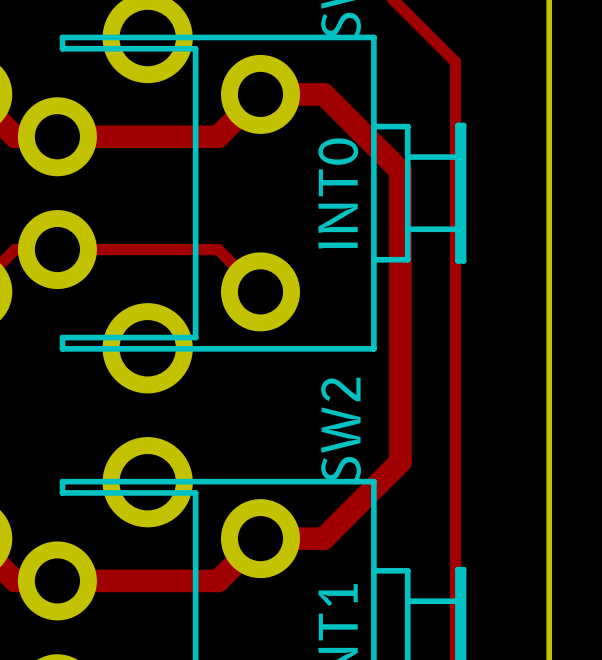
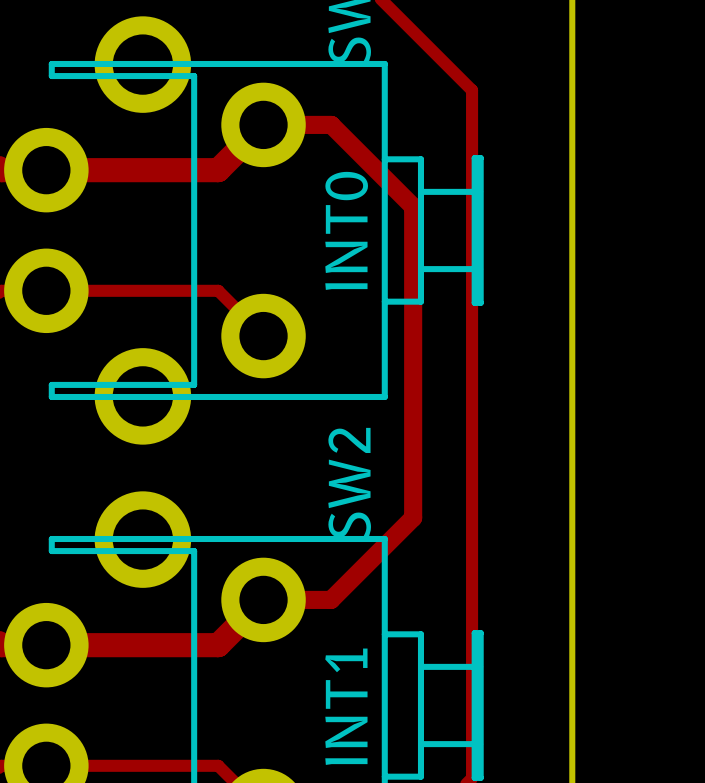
track width: thick (260, 94) (323, 94) (400, 170) (400, 461) (323, 538) (260, 538) -> thin (263, 124) (331, 124) (413, 206) (413, 517) (331, 599) (263, 599)

